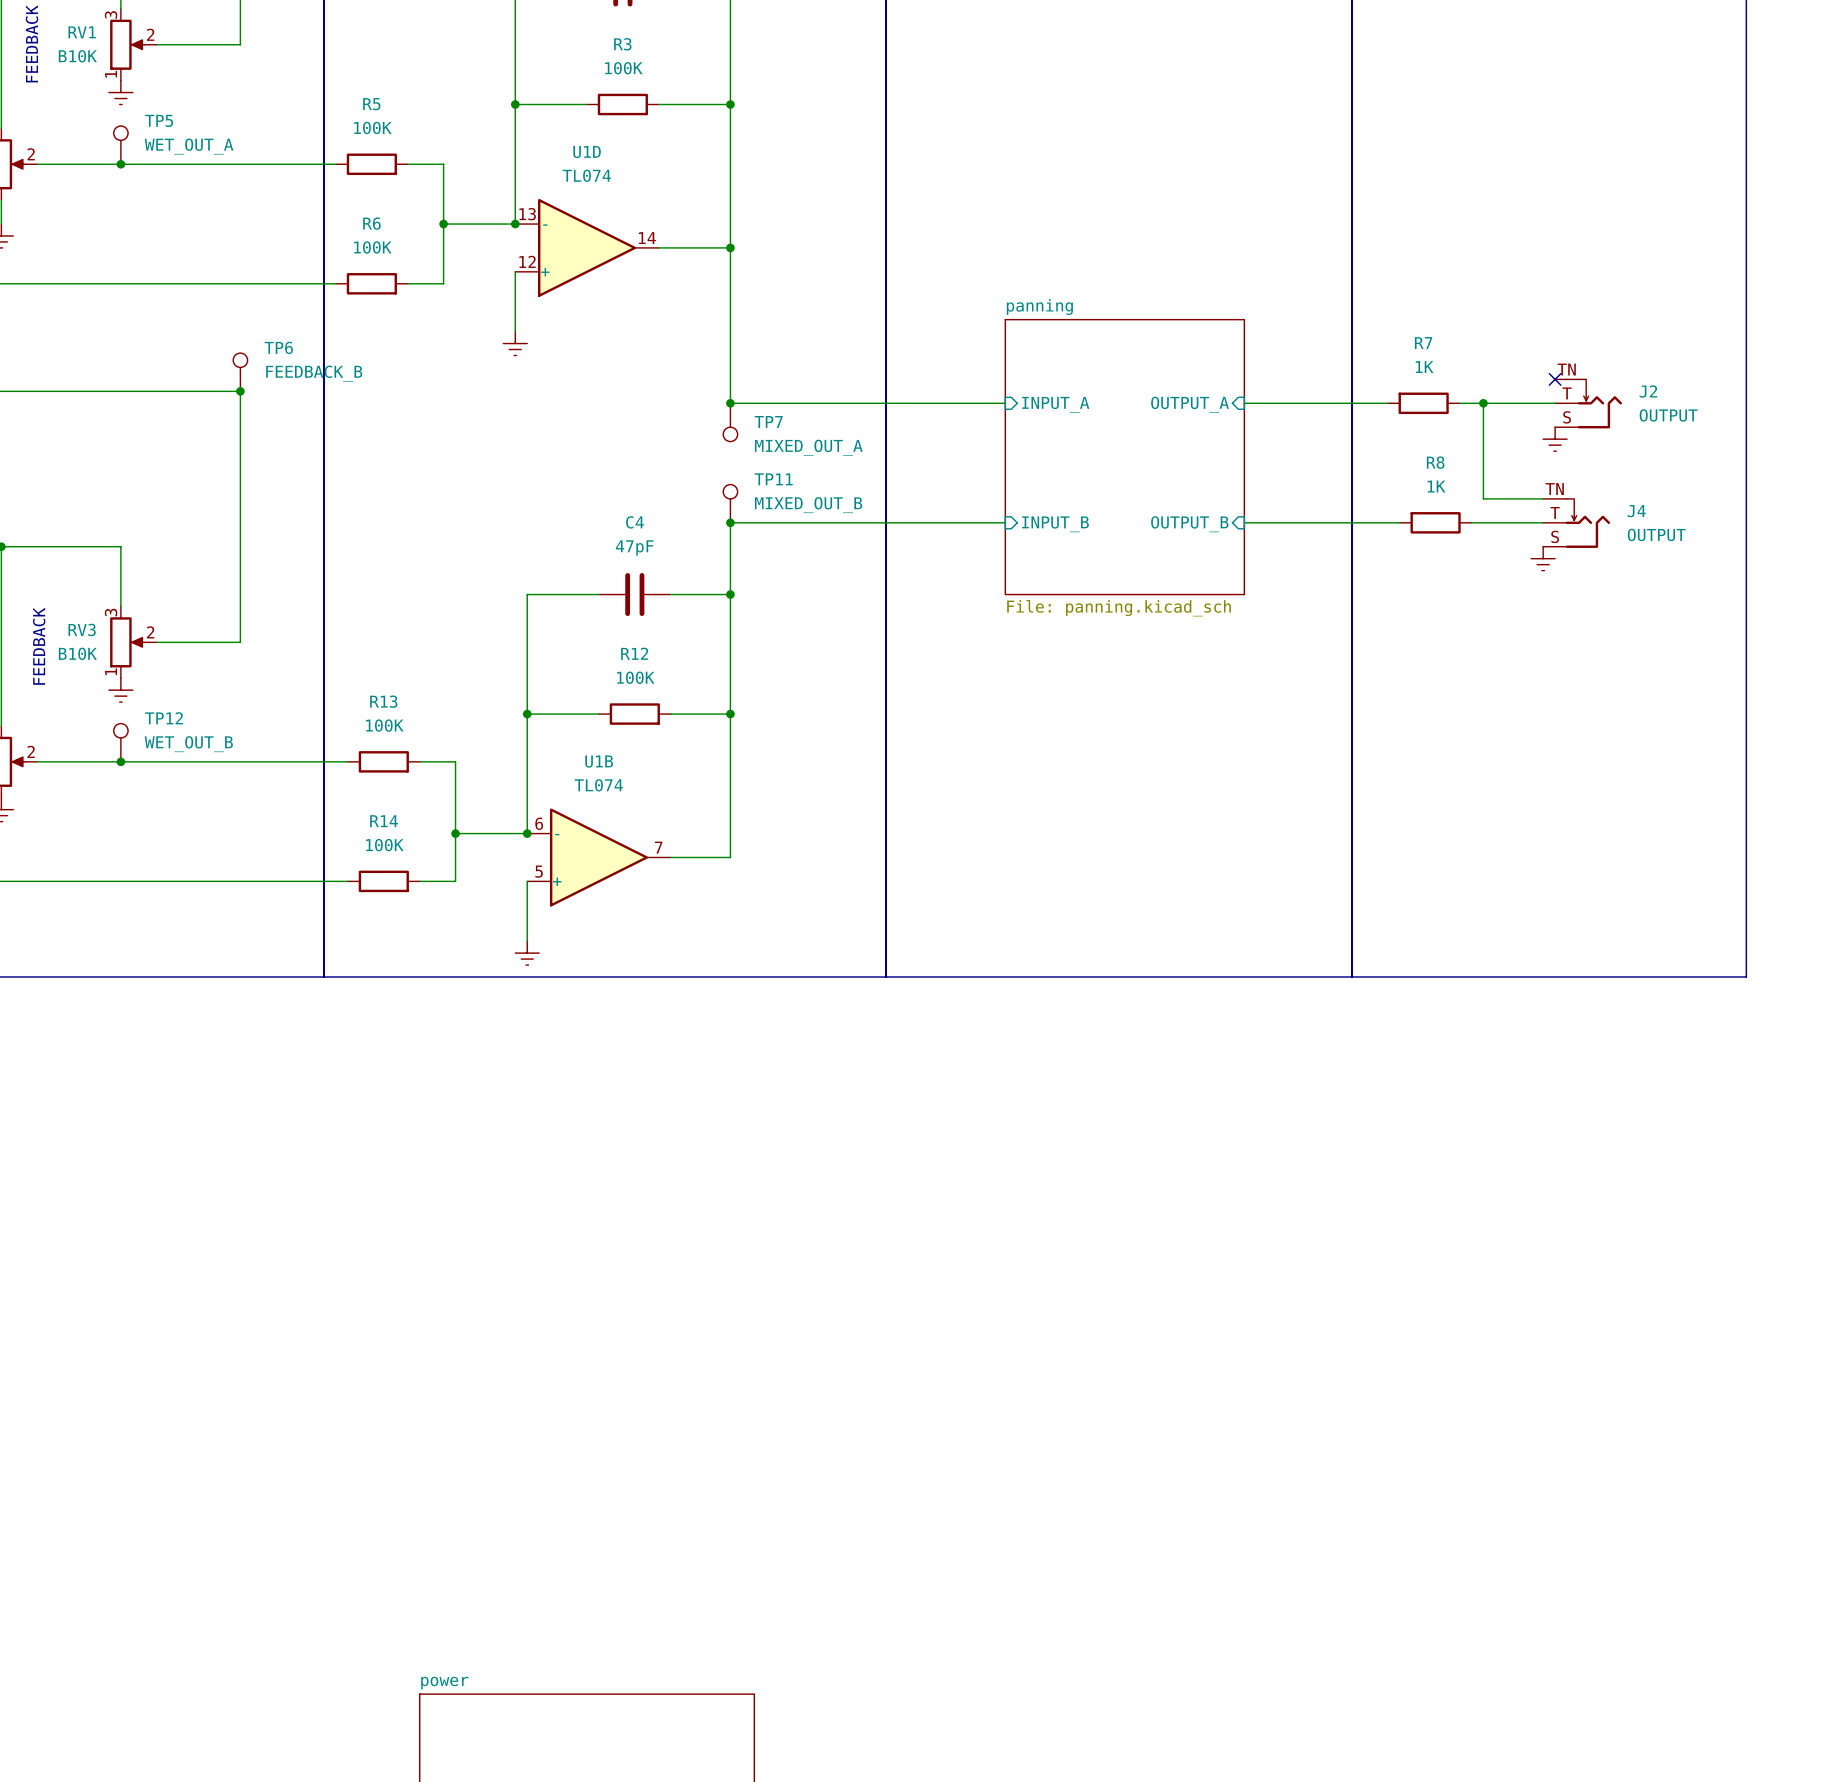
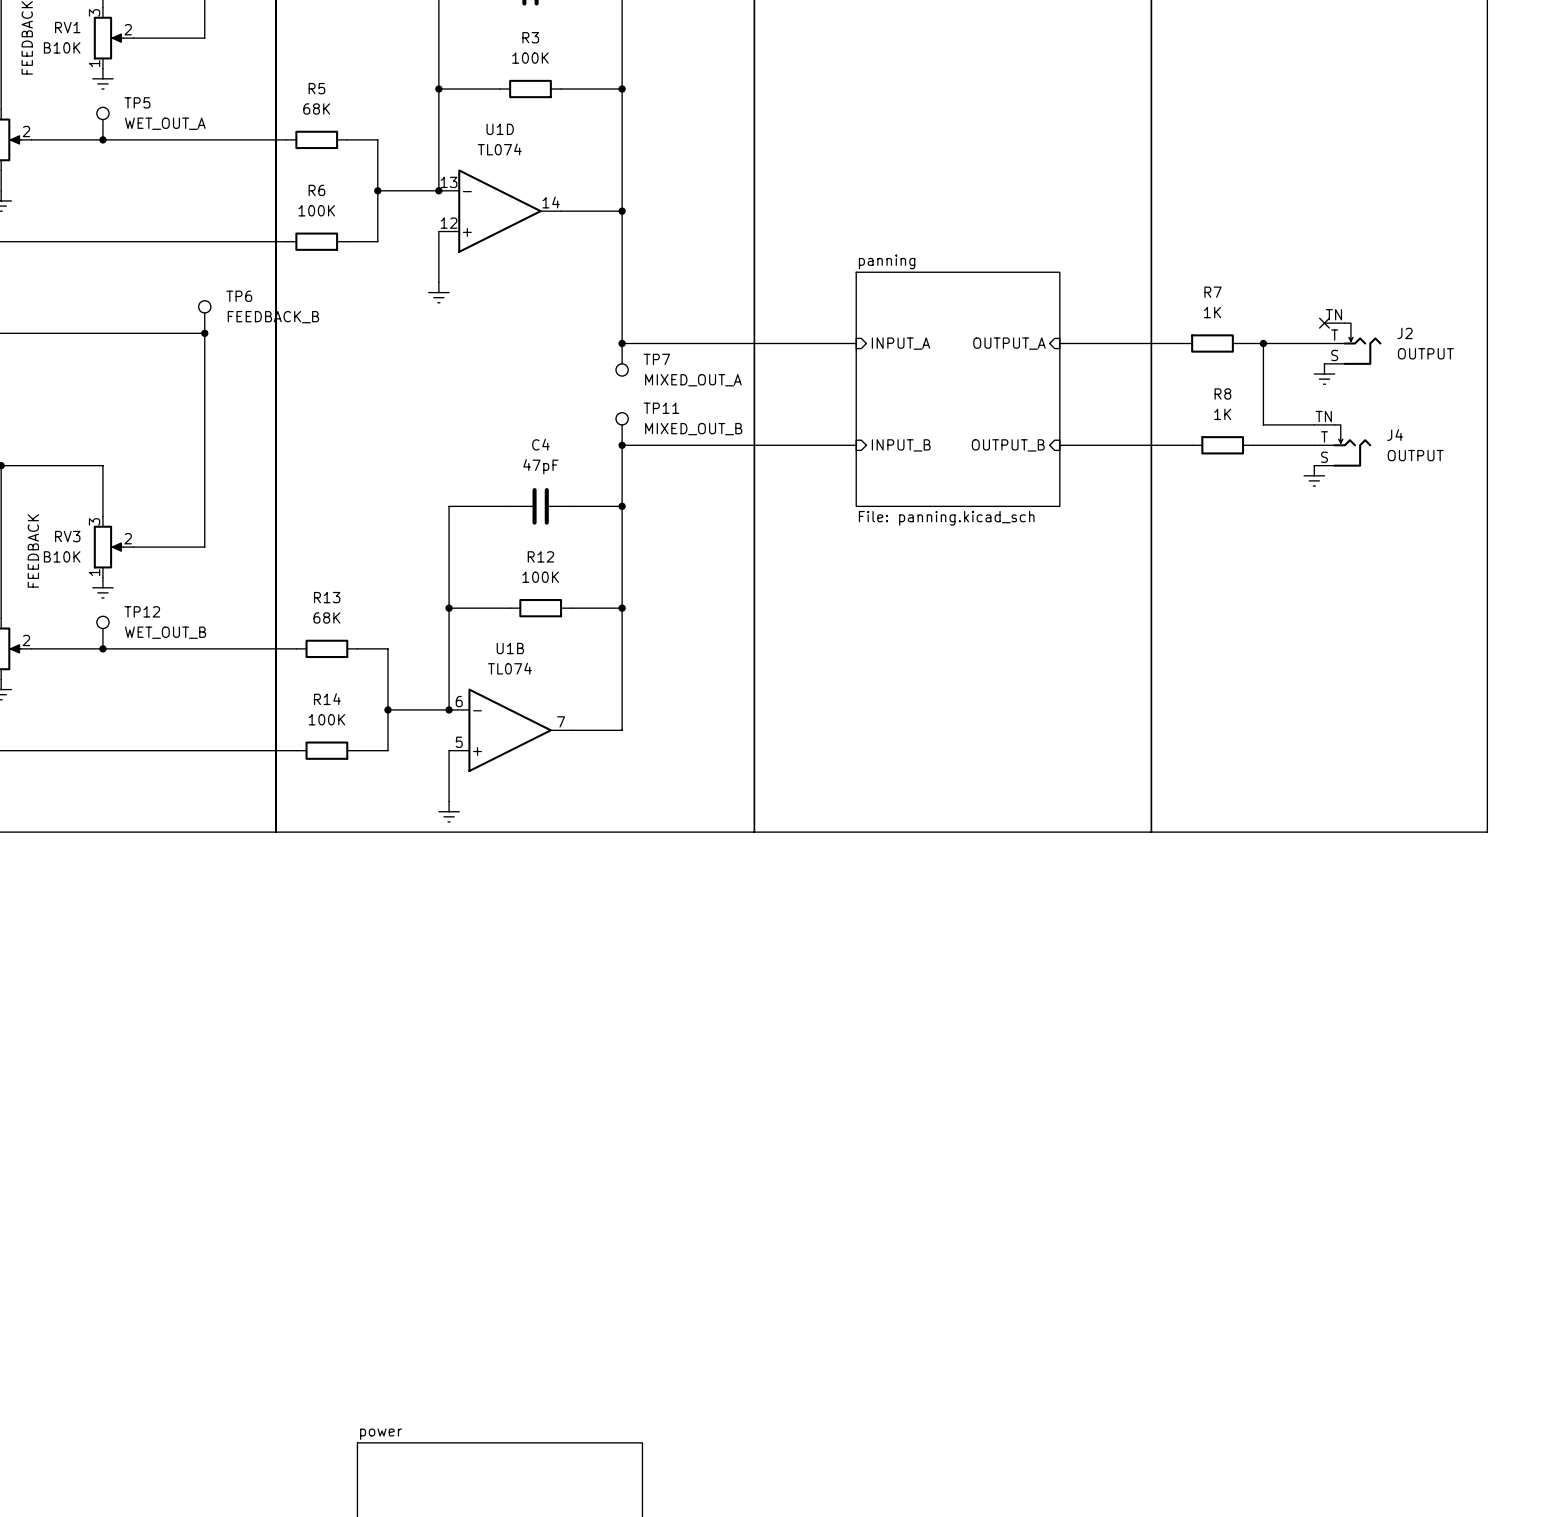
R5 value: 100K (372, 127) -> 68K (316, 108)
R13 value: 100K (384, 725) -> 68K (326, 617)

